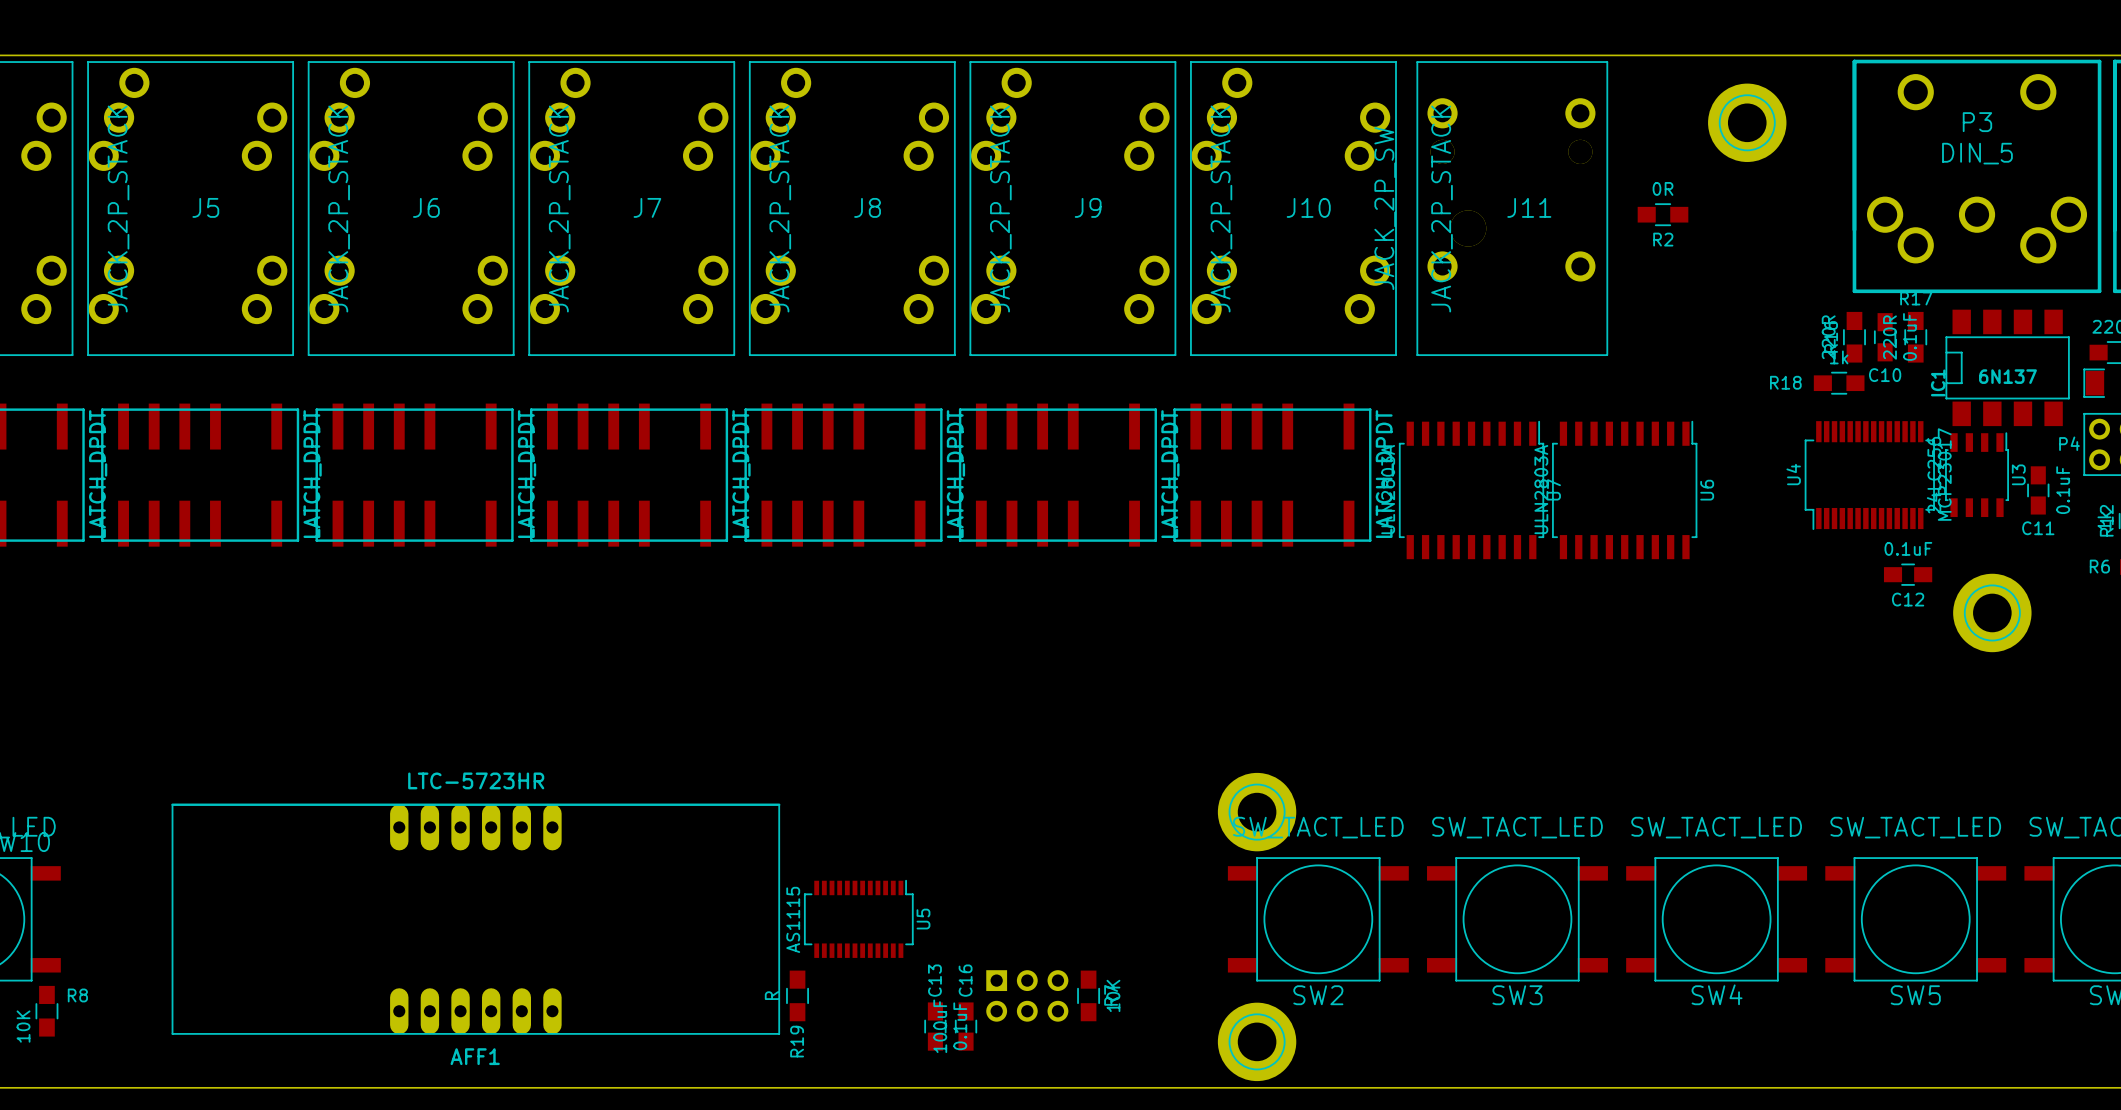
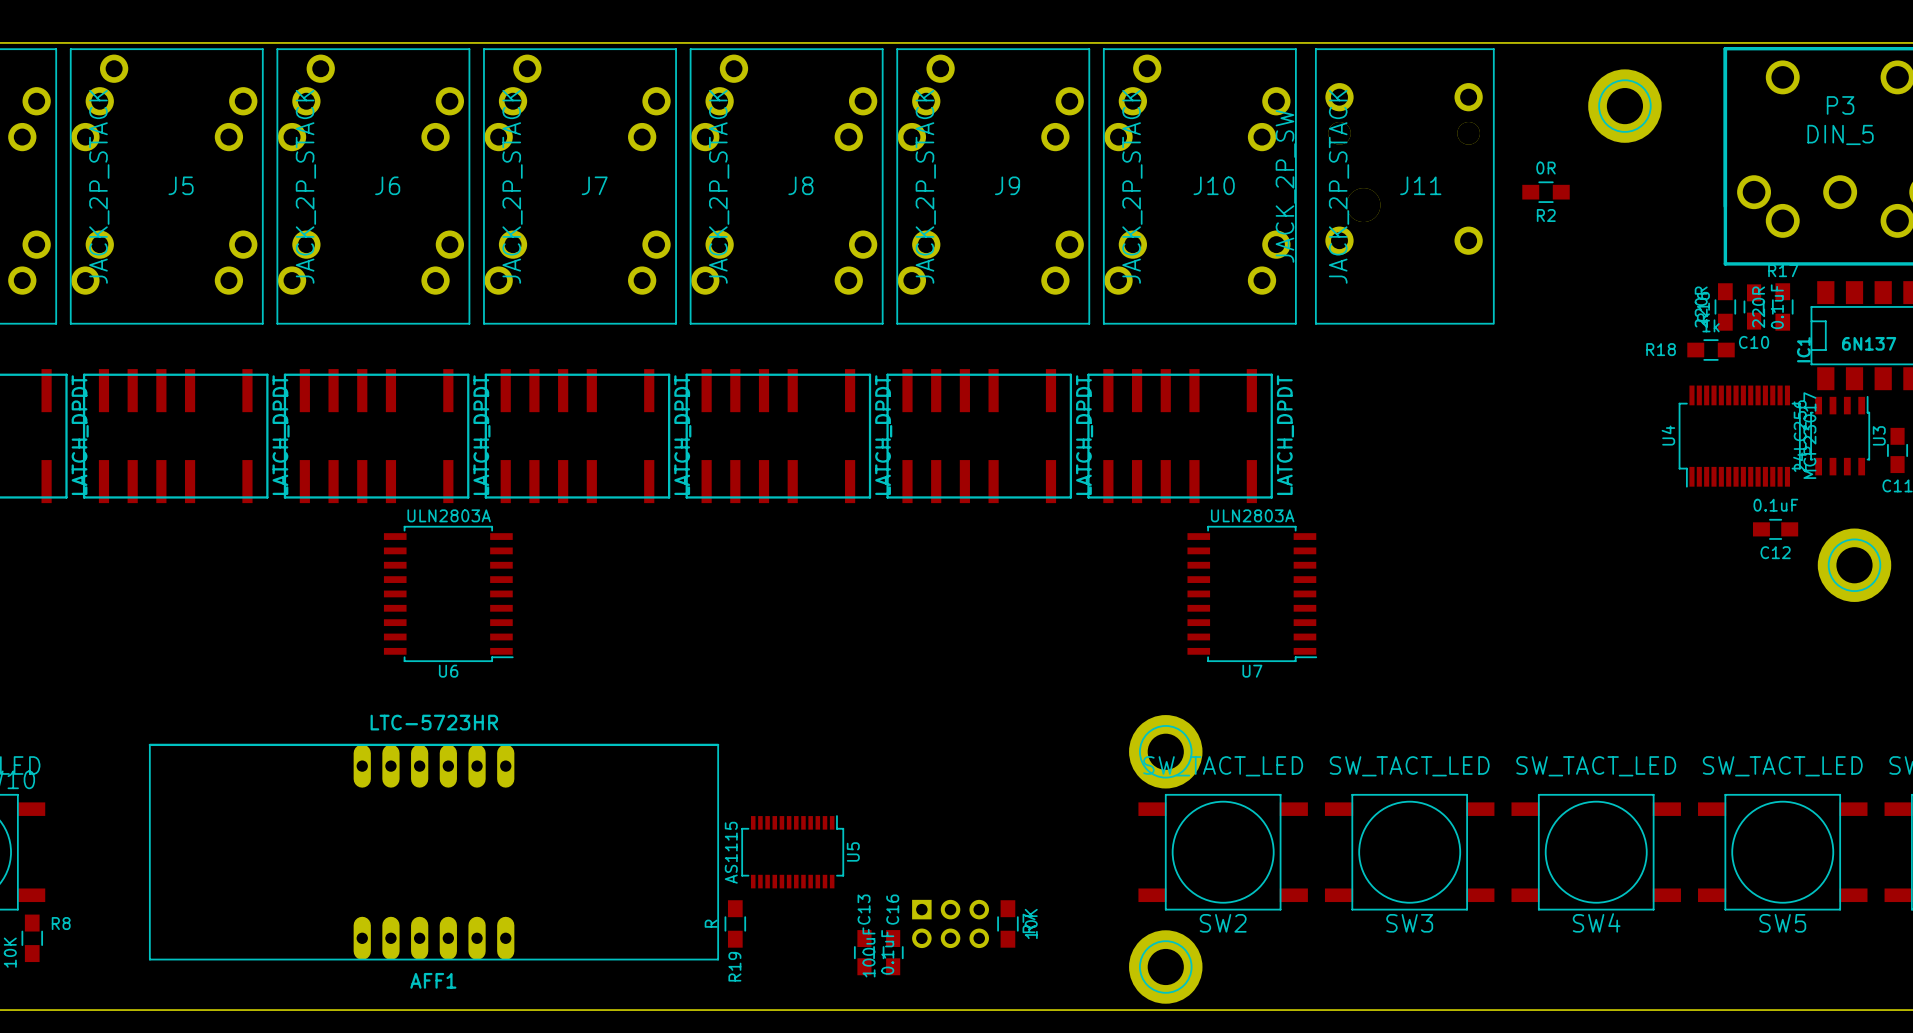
U7 rotation: 0° (1471, 489) -> 90° clockwise (1252, 593)
U7 position: (1471, 489) -> (1252, 593)
U6 rotation: 0° (1624, 489) -> 90° clockwise (448, 593)
U6 position: (1624, 489) -> (448, 593)

